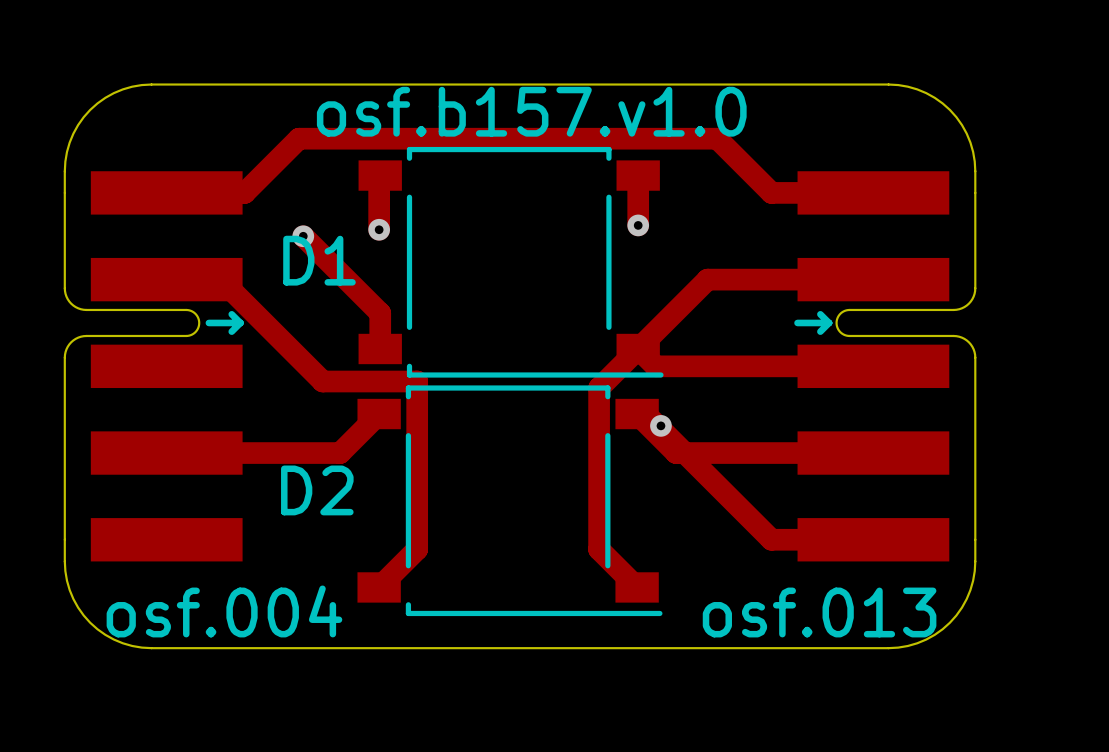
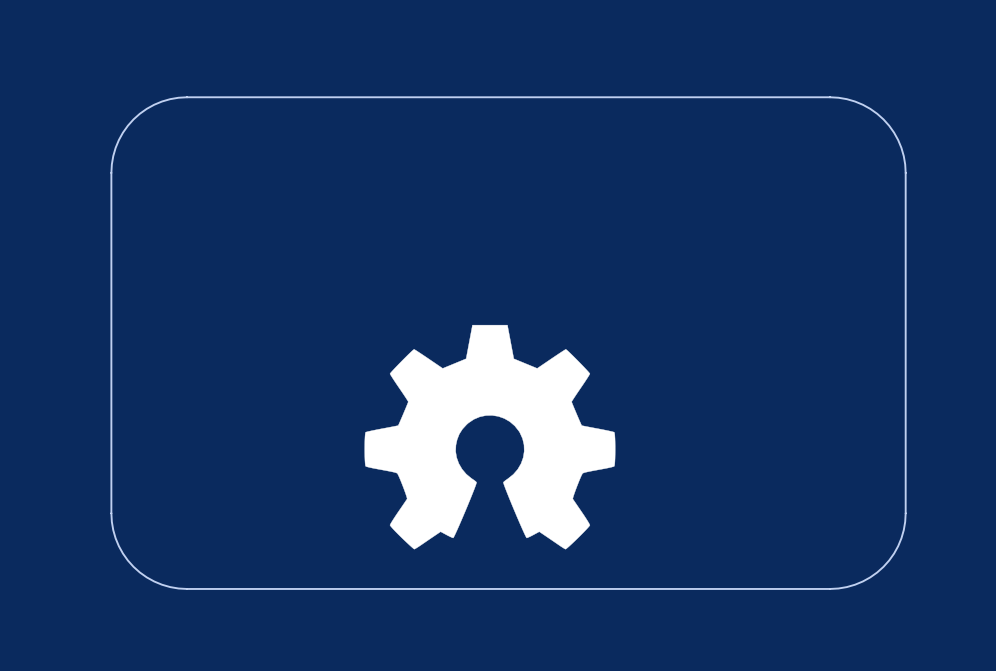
text: osf.b157.v1.0 (531, 111) -> none
track: (380, 175) (379, 229) -> none
track: (638, 175) (638, 225) -> none
board edge: none -> (111, 191) (111, 494)
track: (166, 192) (244, 192) (298, 138) (717, 138) (771, 192) (873, 192) -> none
board edge: none -> (905, 191) (905, 494)
via: (638, 225) -> none
via: (379, 229) -> none
track: (303, 236) (380, 313) (380, 348) -> none
via: (303, 236) -> none
D1: (511, 262) -> none
track: (166, 279) (220, 279) (322, 381) (417, 381) (417, 549) (379, 587) -> none
track: (873, 279) (707, 279) (599, 388) (599, 549) (637, 587) -> none
drawing: none -> [364, 324, 616, 550]
track: (638, 348) (655, 366) (873, 366) -> none
part: (153, 366) -> none
part: (885, 366) -> none
track: (379, 414) (340, 453) (166, 453) -> none
via: (660, 425) -> none
track: (873, 453) (676, 453) (637, 414) (645, 414) (771, 539) (873, 539) -> none
D2: (509, 500) -> none
text: osf.004 (224, 611) -> none
text: osf.013 (819, 612) -> none

